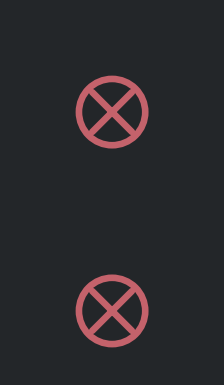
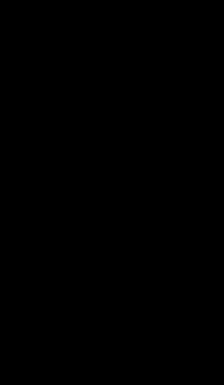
part: (112, 112) -> none
part: (112, 310) -> none

